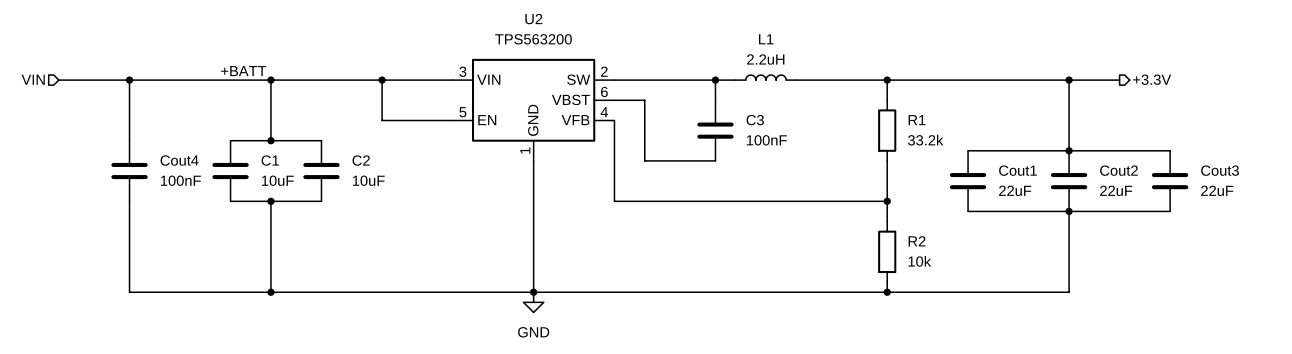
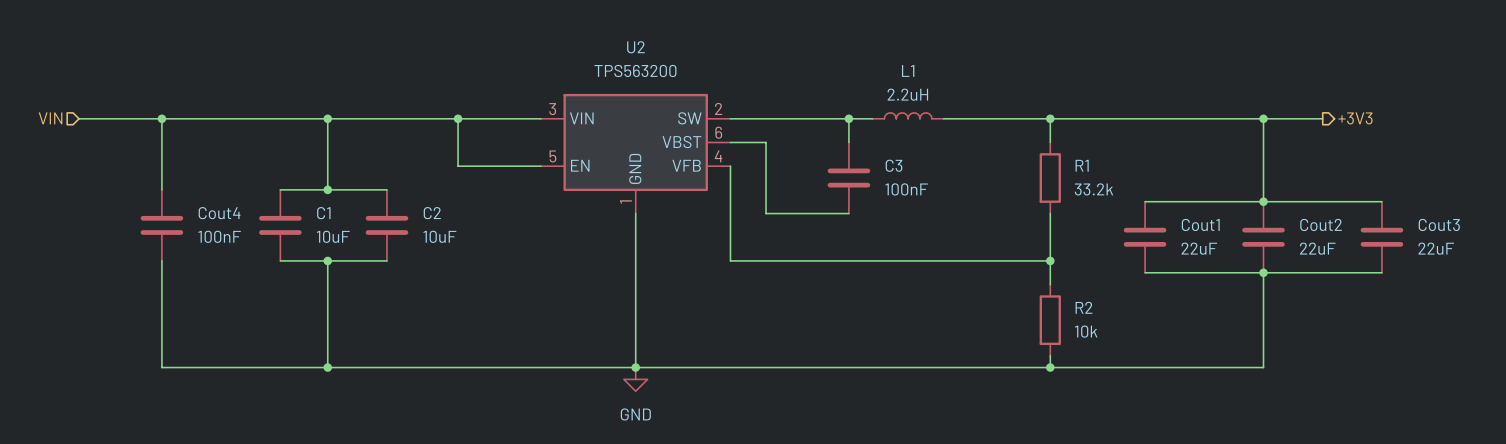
label: +BATT (243, 71) -> none
hierarchical label: +3.3V (1152, 79) -> +3V3 (1355, 118)

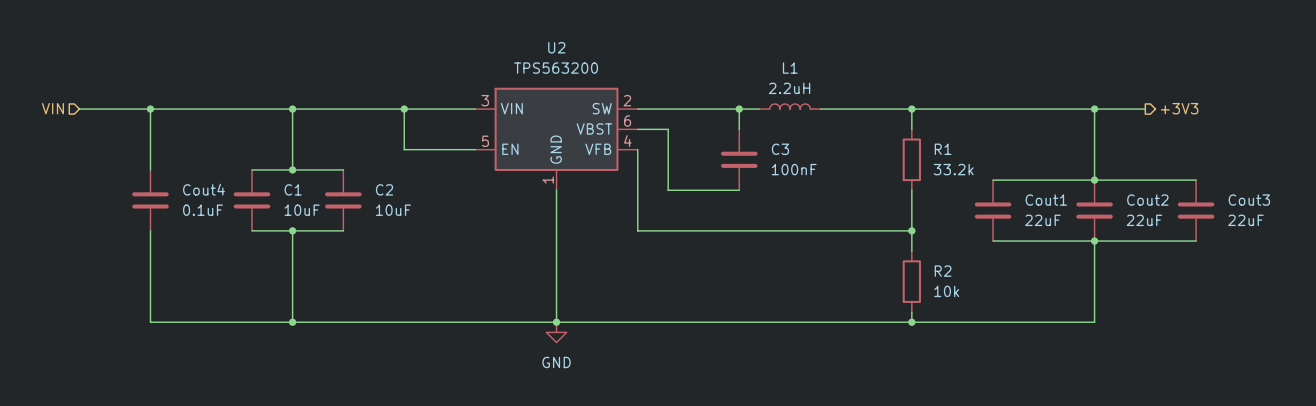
Cout4 value: 100nF (219, 236) -> 0.1uF (203, 210)

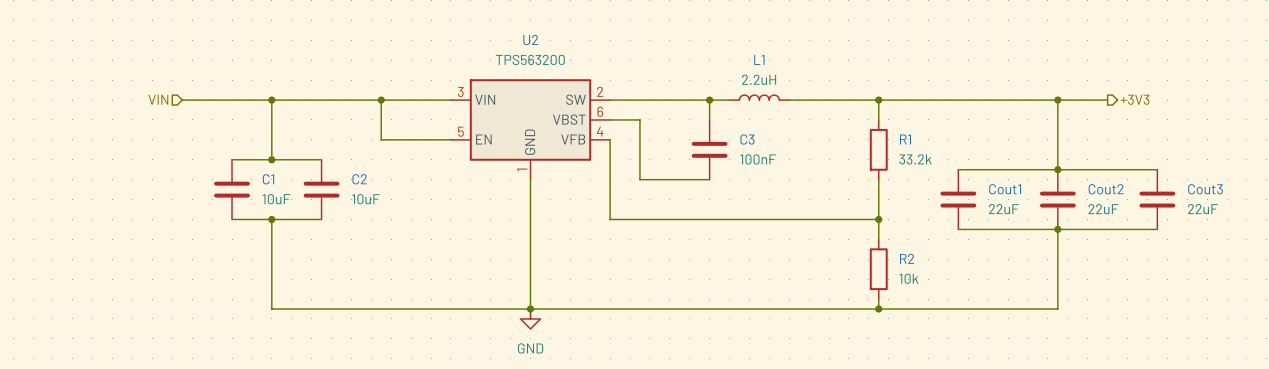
hierarchical label position: VIN (52, 108) -> VIN (158, 99)
wire: (79, 109) (201, 109) -> none
wire: (150, 109) (150, 169) -> none
junction: (150, 109) -> none
Cout4: 0.1uF (150, 200) -> none
wire: (150, 230) (150, 322) (292, 322) -> none
junction: (292, 322) -> none

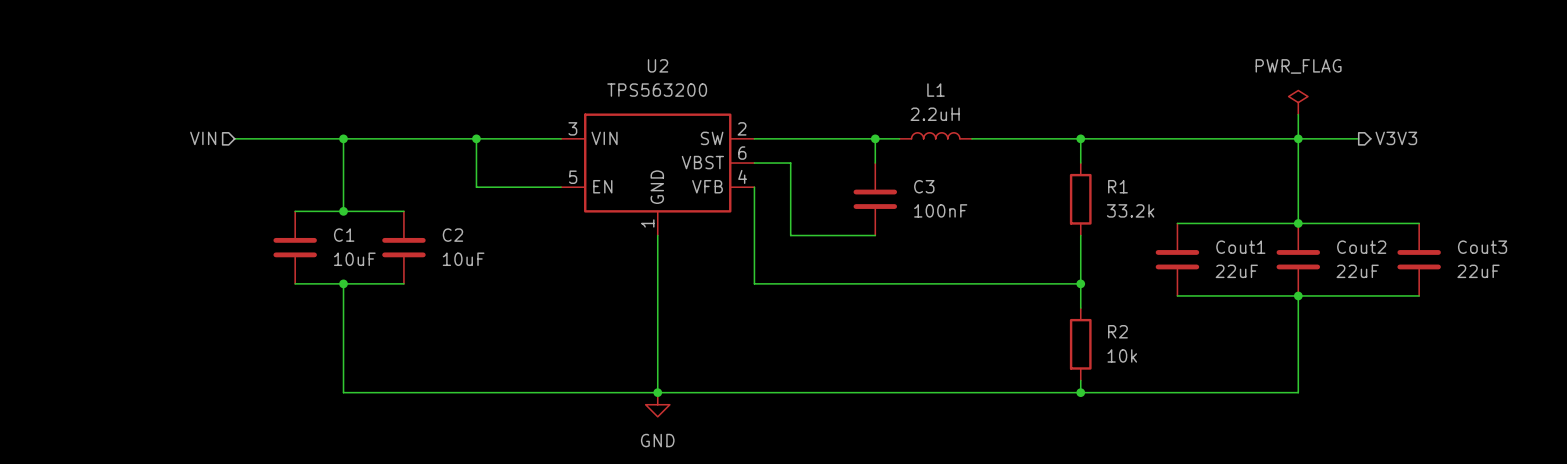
power symbol: none -> PWR_FLAG (1298, 102)
wire: none -> (1298, 114) (1298, 138)
hierarchical label: +3V3 (1135, 99) -> V3V3 (1396, 138)

